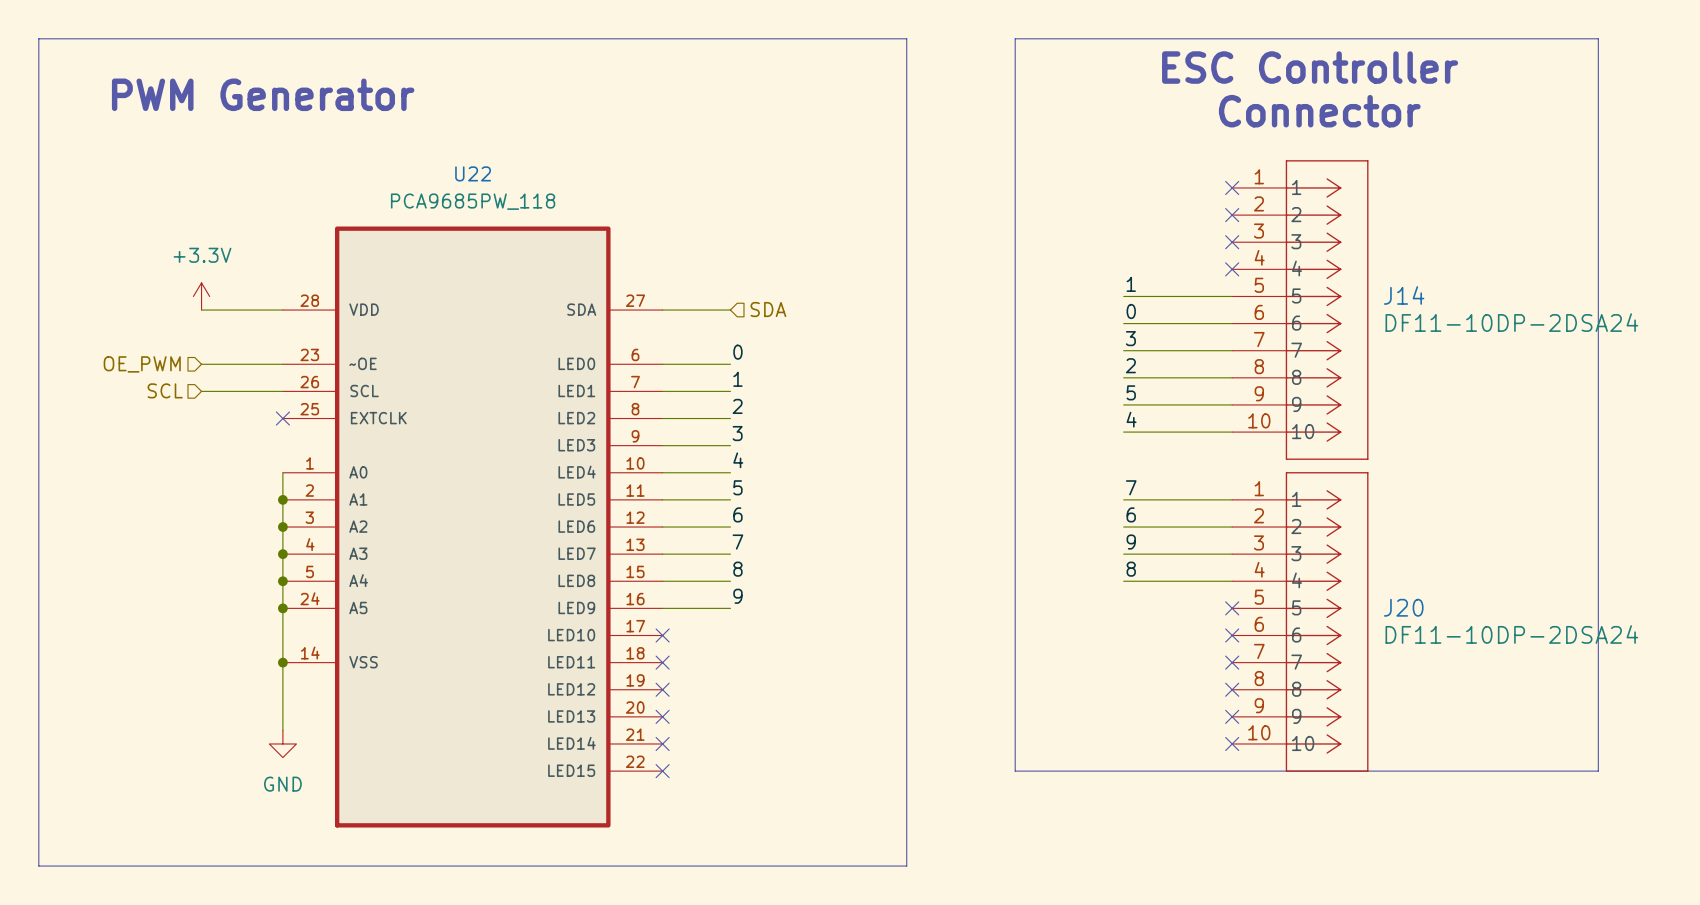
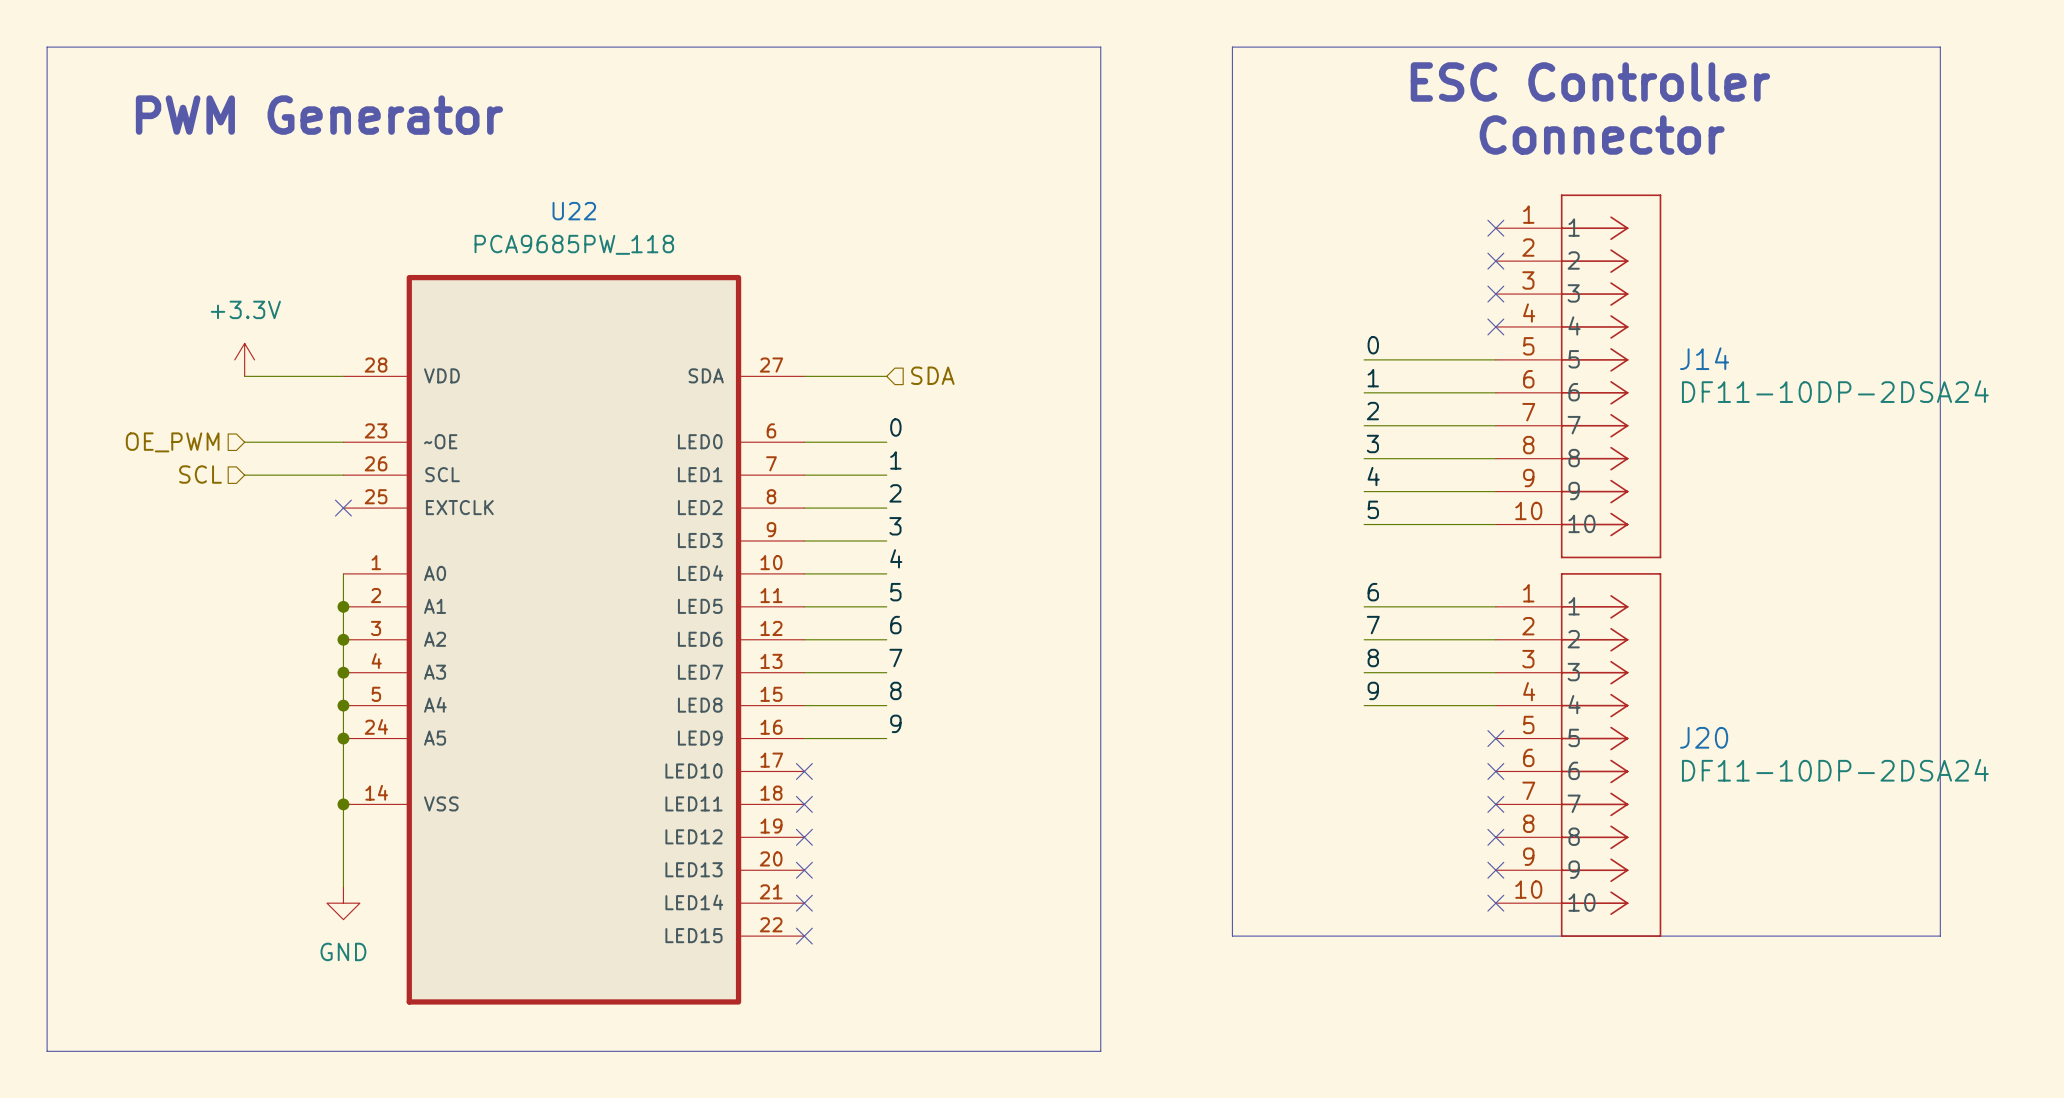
label: 1 (1131, 284) -> 0 (1373, 345)
label: 0 (1131, 311) -> 1 (1373, 378)
label: 3 (1130, 338) -> 2 (1372, 411)
label: 2 (1130, 365) -> 3 (1372, 443)
label: 5 (1131, 392) -> 4 (1373, 476)
label: 4 (1131, 419) -> 5 (1373, 509)
label: 7 (1131, 487) -> 6 (1373, 592)
label: 6 (1131, 514) -> 7 (1373, 625)
label: 9 (1131, 542) -> 8 (1373, 658)
label: 8 (1131, 569) -> 9 (1373, 690)

